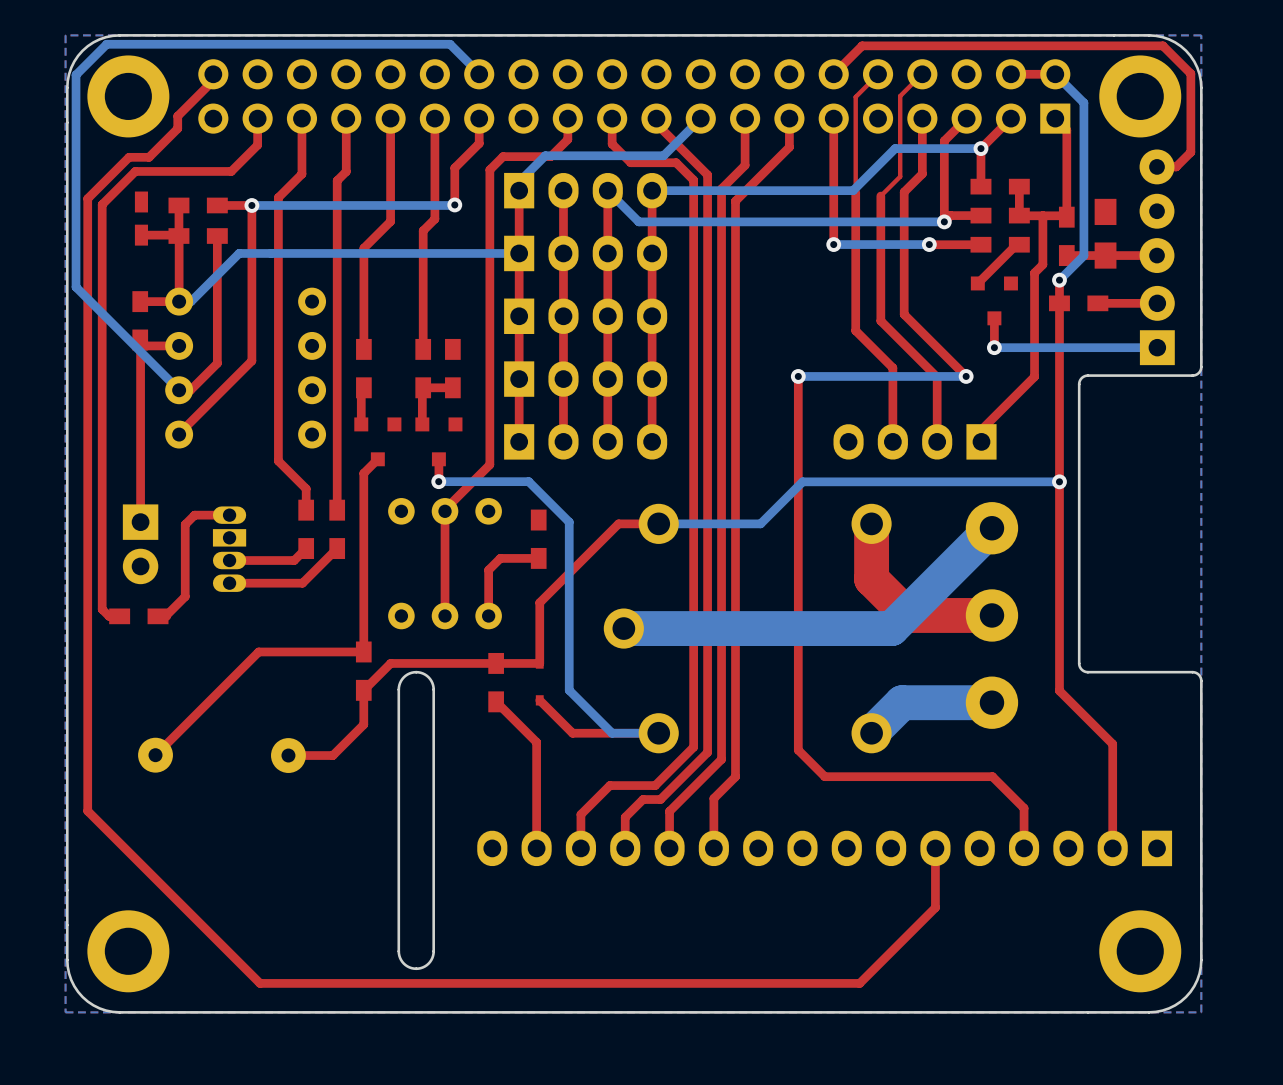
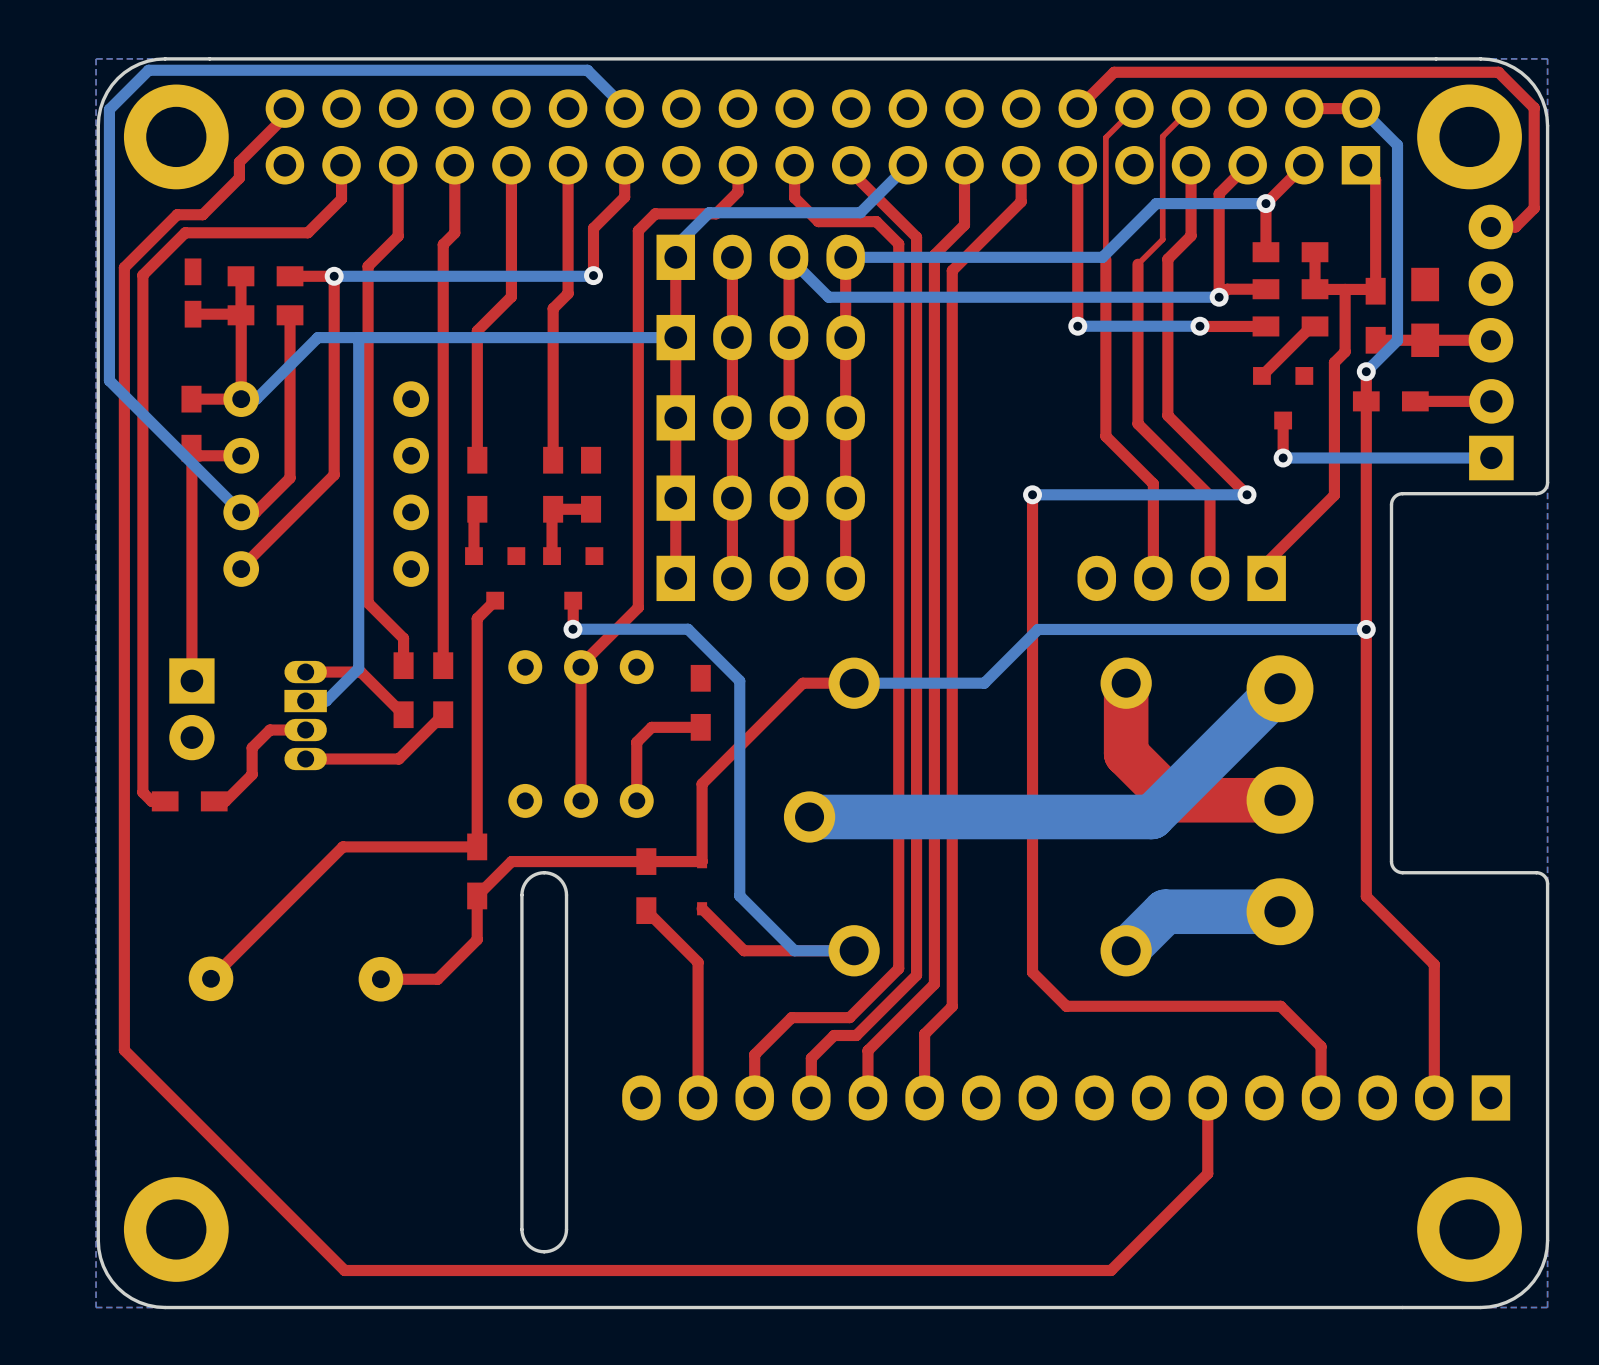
bottom track: none -> (358, 337) (358, 668) (326, 701) (305, 701)
top track: (229, 515) (194, 515) (185, 524) (185, 596) (165, 616) -> none
top track: (306, 548) (294, 560) (229, 560) -> (403, 714) (360, 672) (305, 672)
top track: none -> (305, 730) (269, 730) (252, 747) (252, 774) (225, 801)

